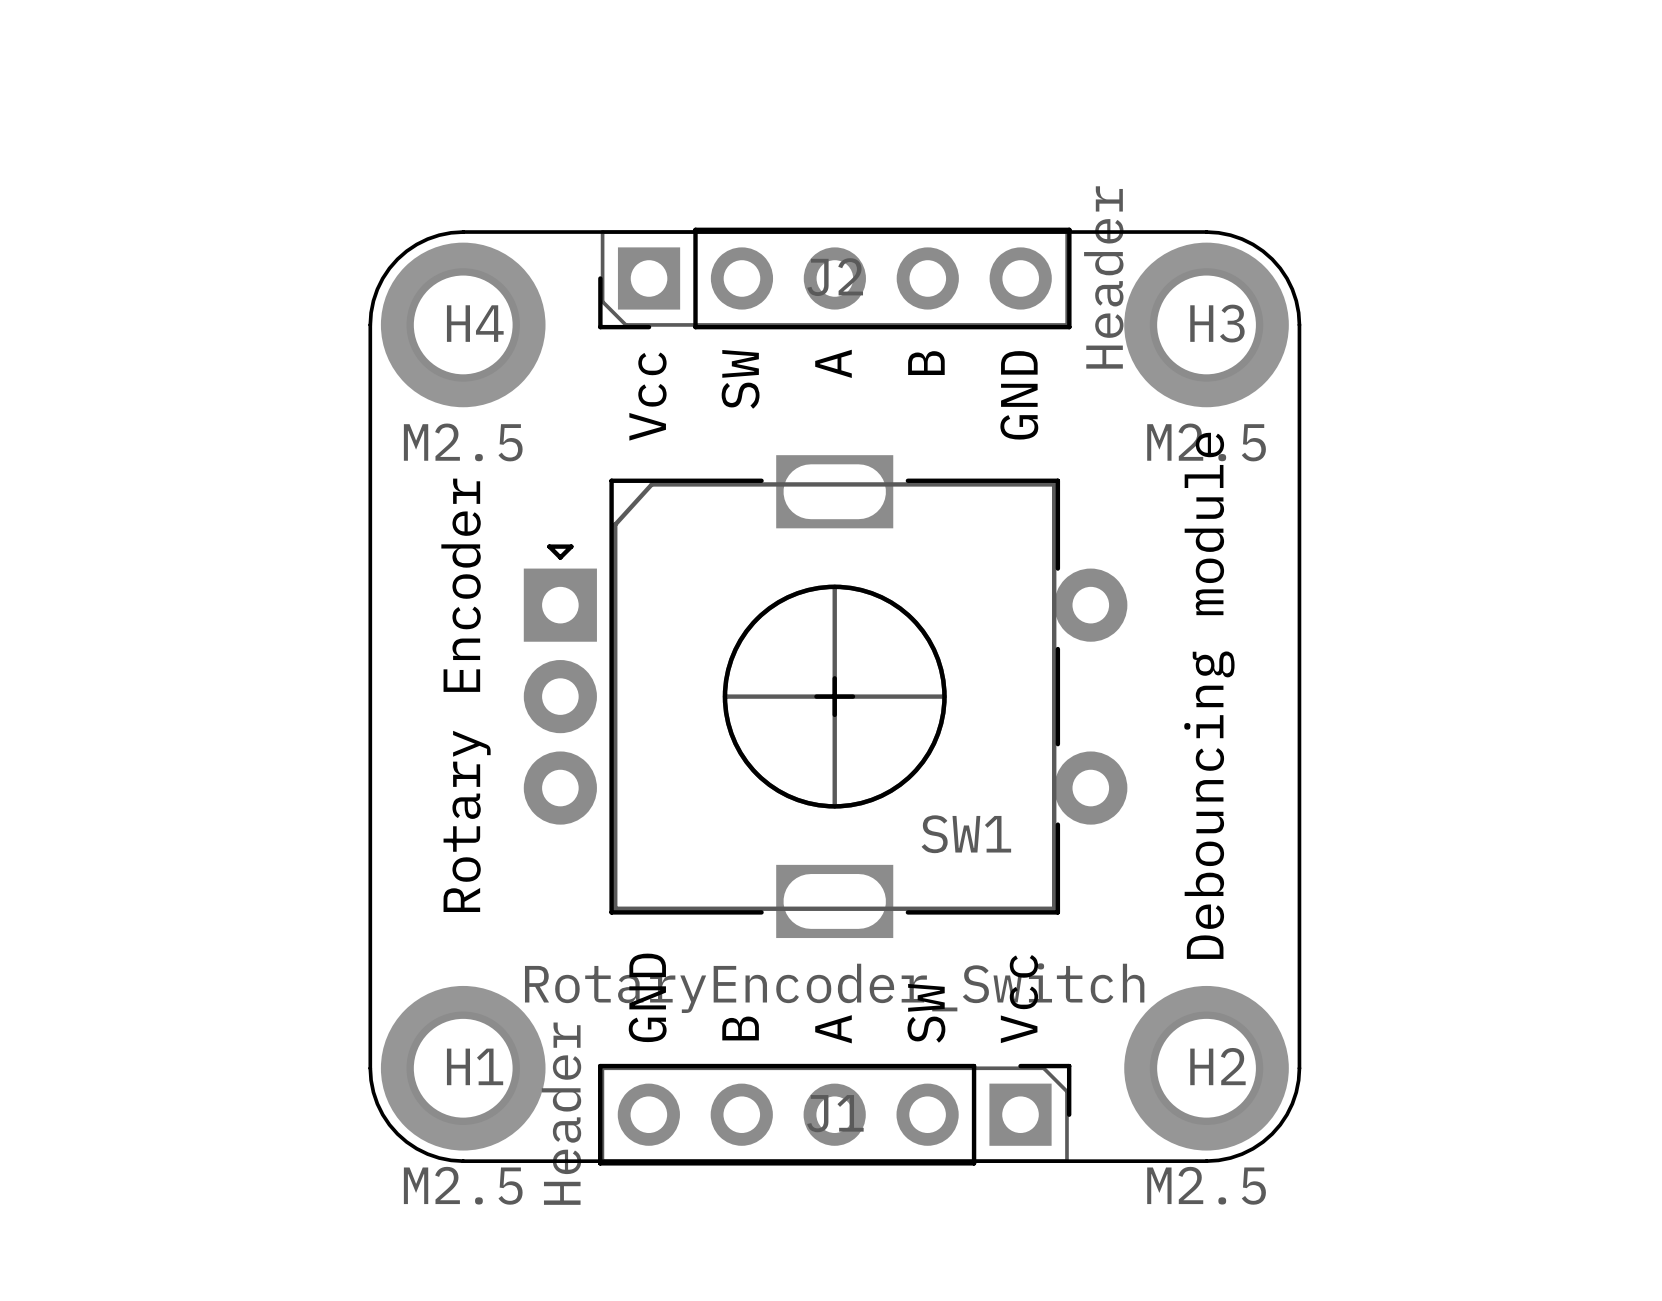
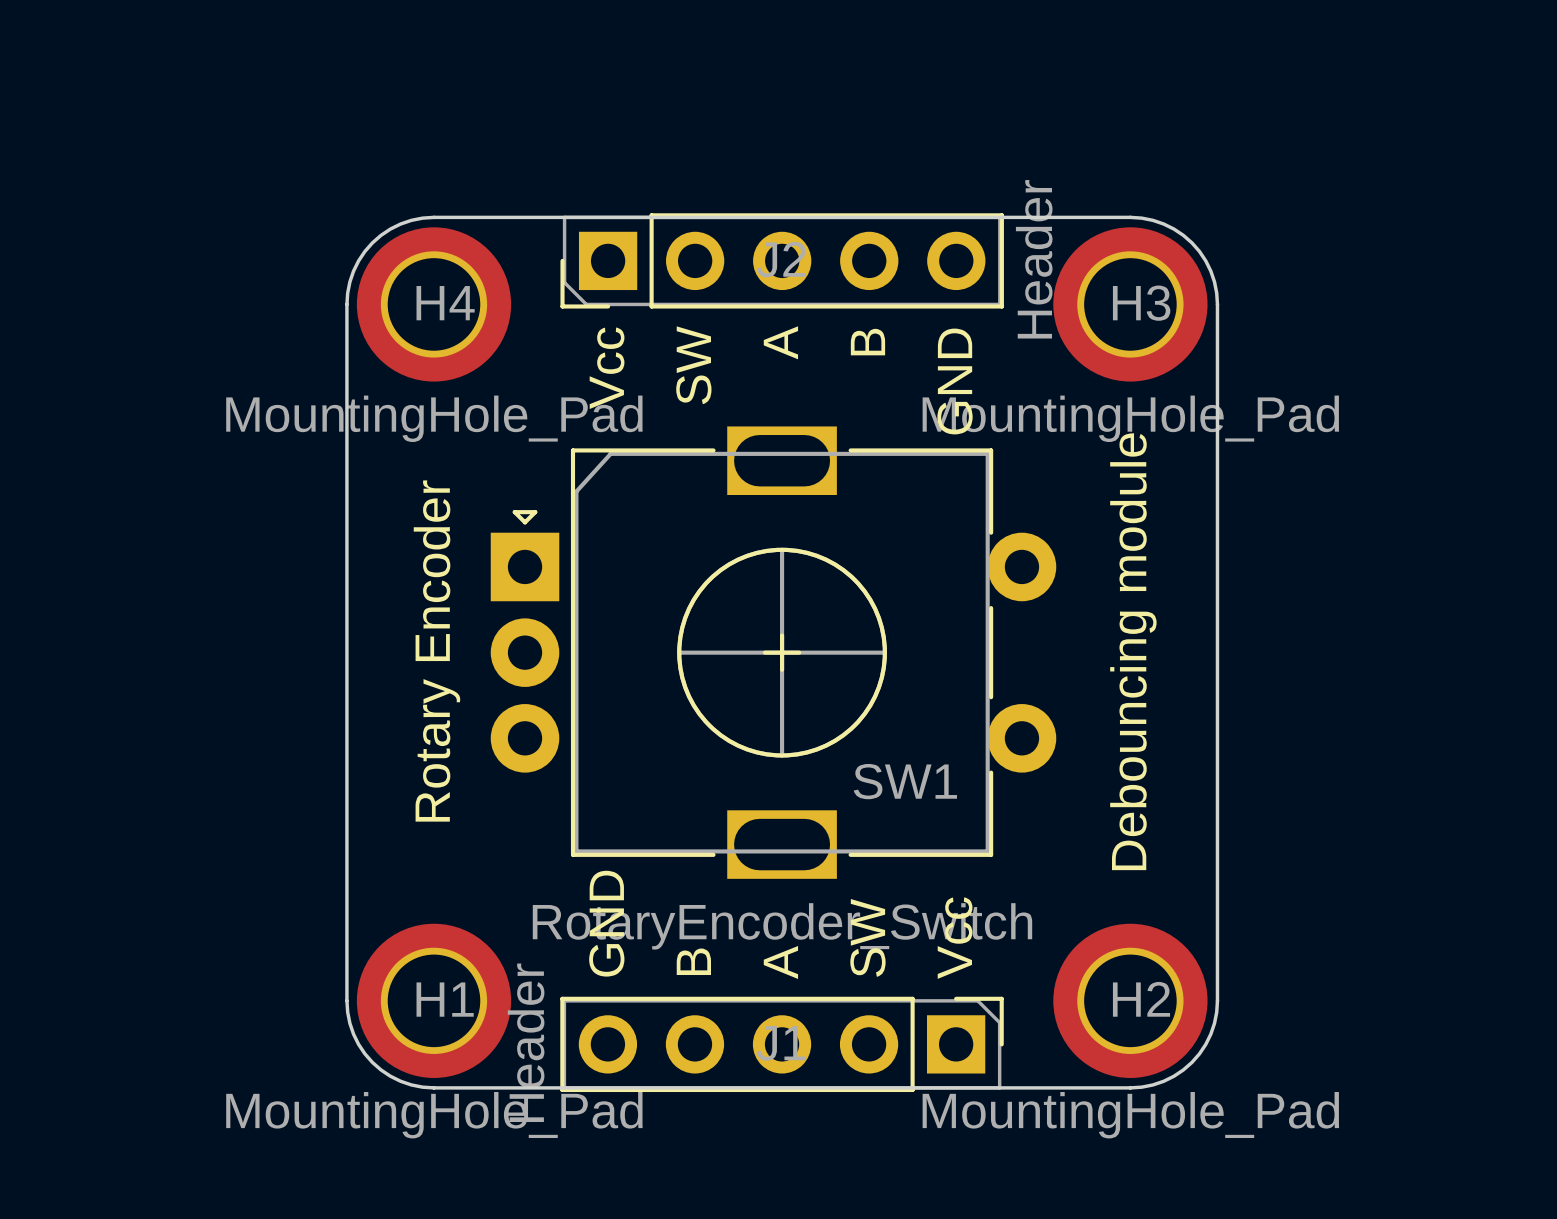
H4 value: M2.5 (463, 442) -> MountingHole_Pad (434, 418)
H3 value: M2.5 (1206, 442) -> MountingHole_Pad (1130, 418)
H1 value: M2.5 (463, 1185) -> MountingHole_Pad (434, 1115)
H2 value: M2.5 (1206, 1185) -> MountingHole_Pad (1130, 1115)

